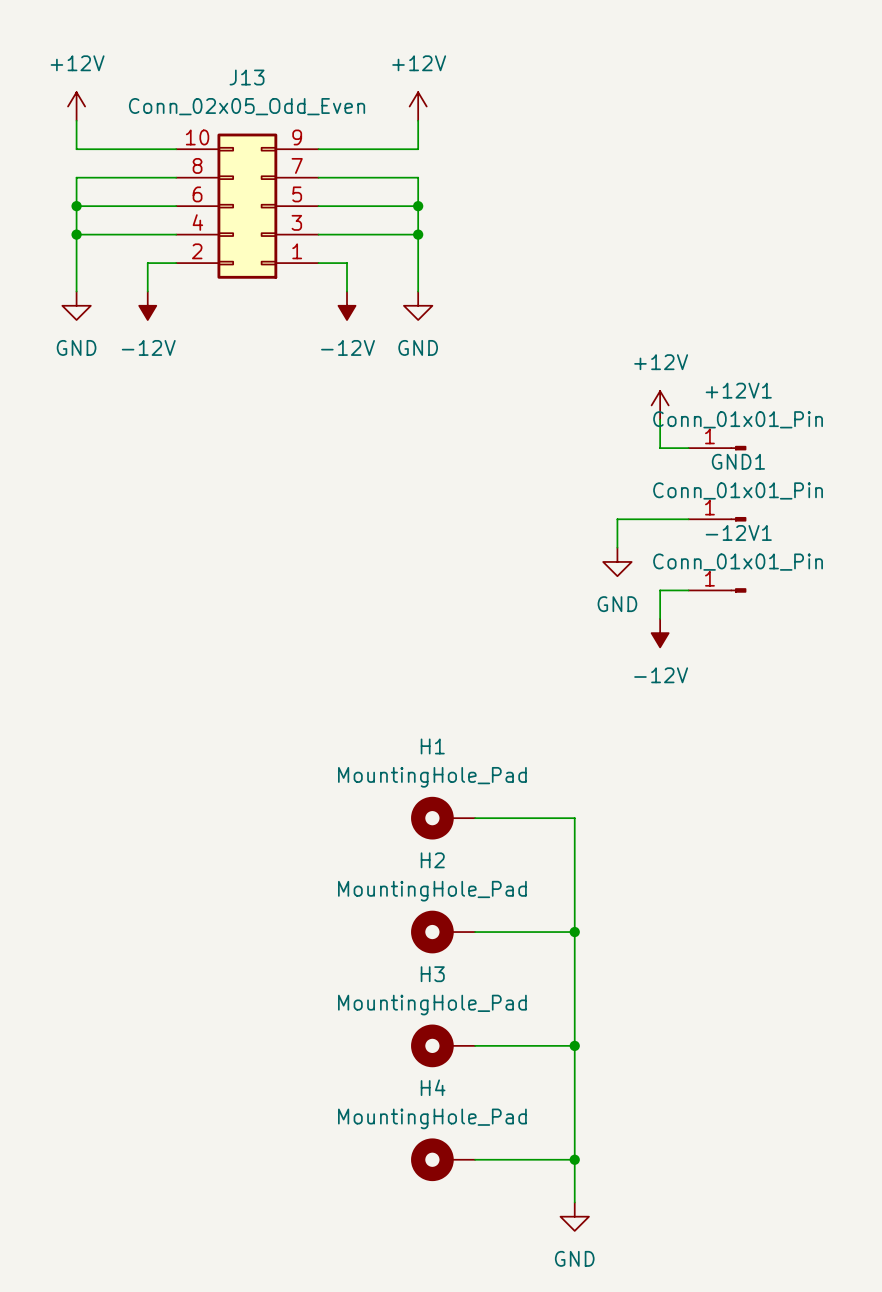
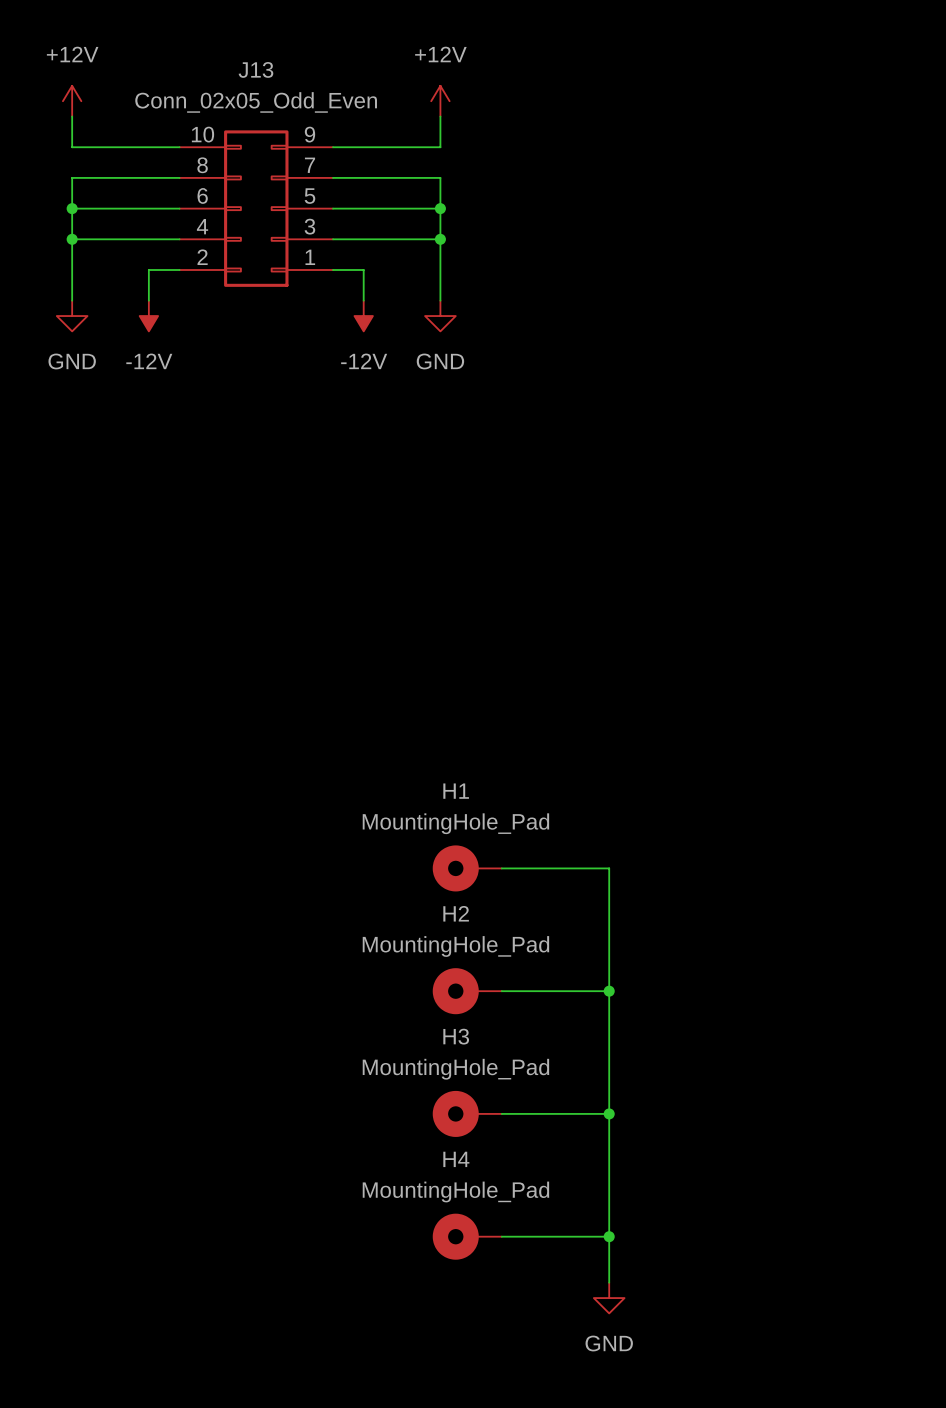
power symbol: +12V (660, 405) -> none
wire: (660, 419) (660, 448) (688, 448) -> none
+12V1: Conn_01x01_Pin (717, 448) -> none
wire: (688, 519) (617, 519) (617, 547) -> none
GND1: Conn_01x01_Pin (717, 519) -> none
power symbol: GND (617, 561) -> none
wire: (688, 590) (660, 590) (660, 618) -> none
-12V1: Conn_01x01_Pin (717, 590) -> none
power symbol: -12V (660, 633) -> none

